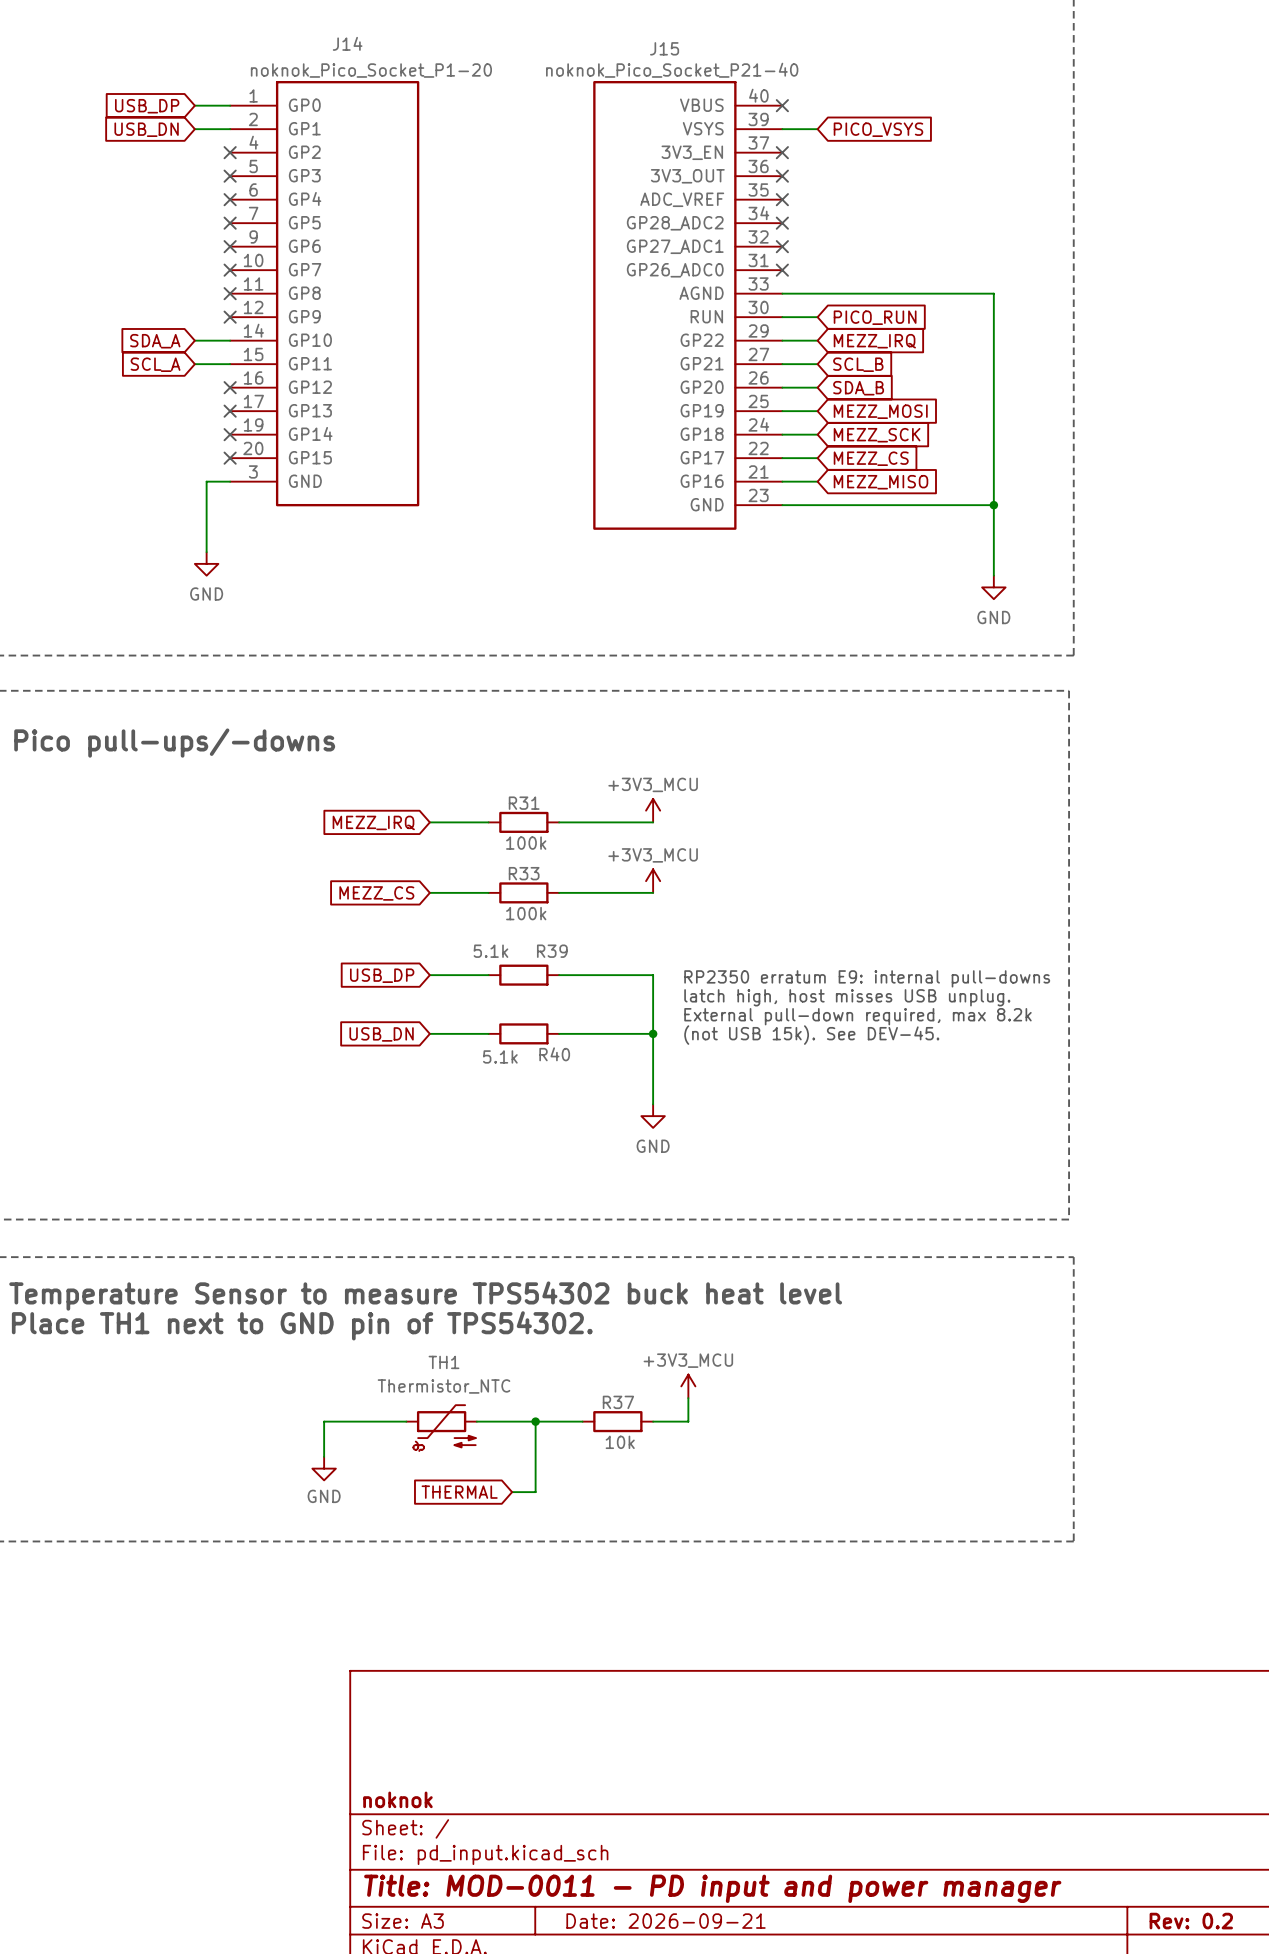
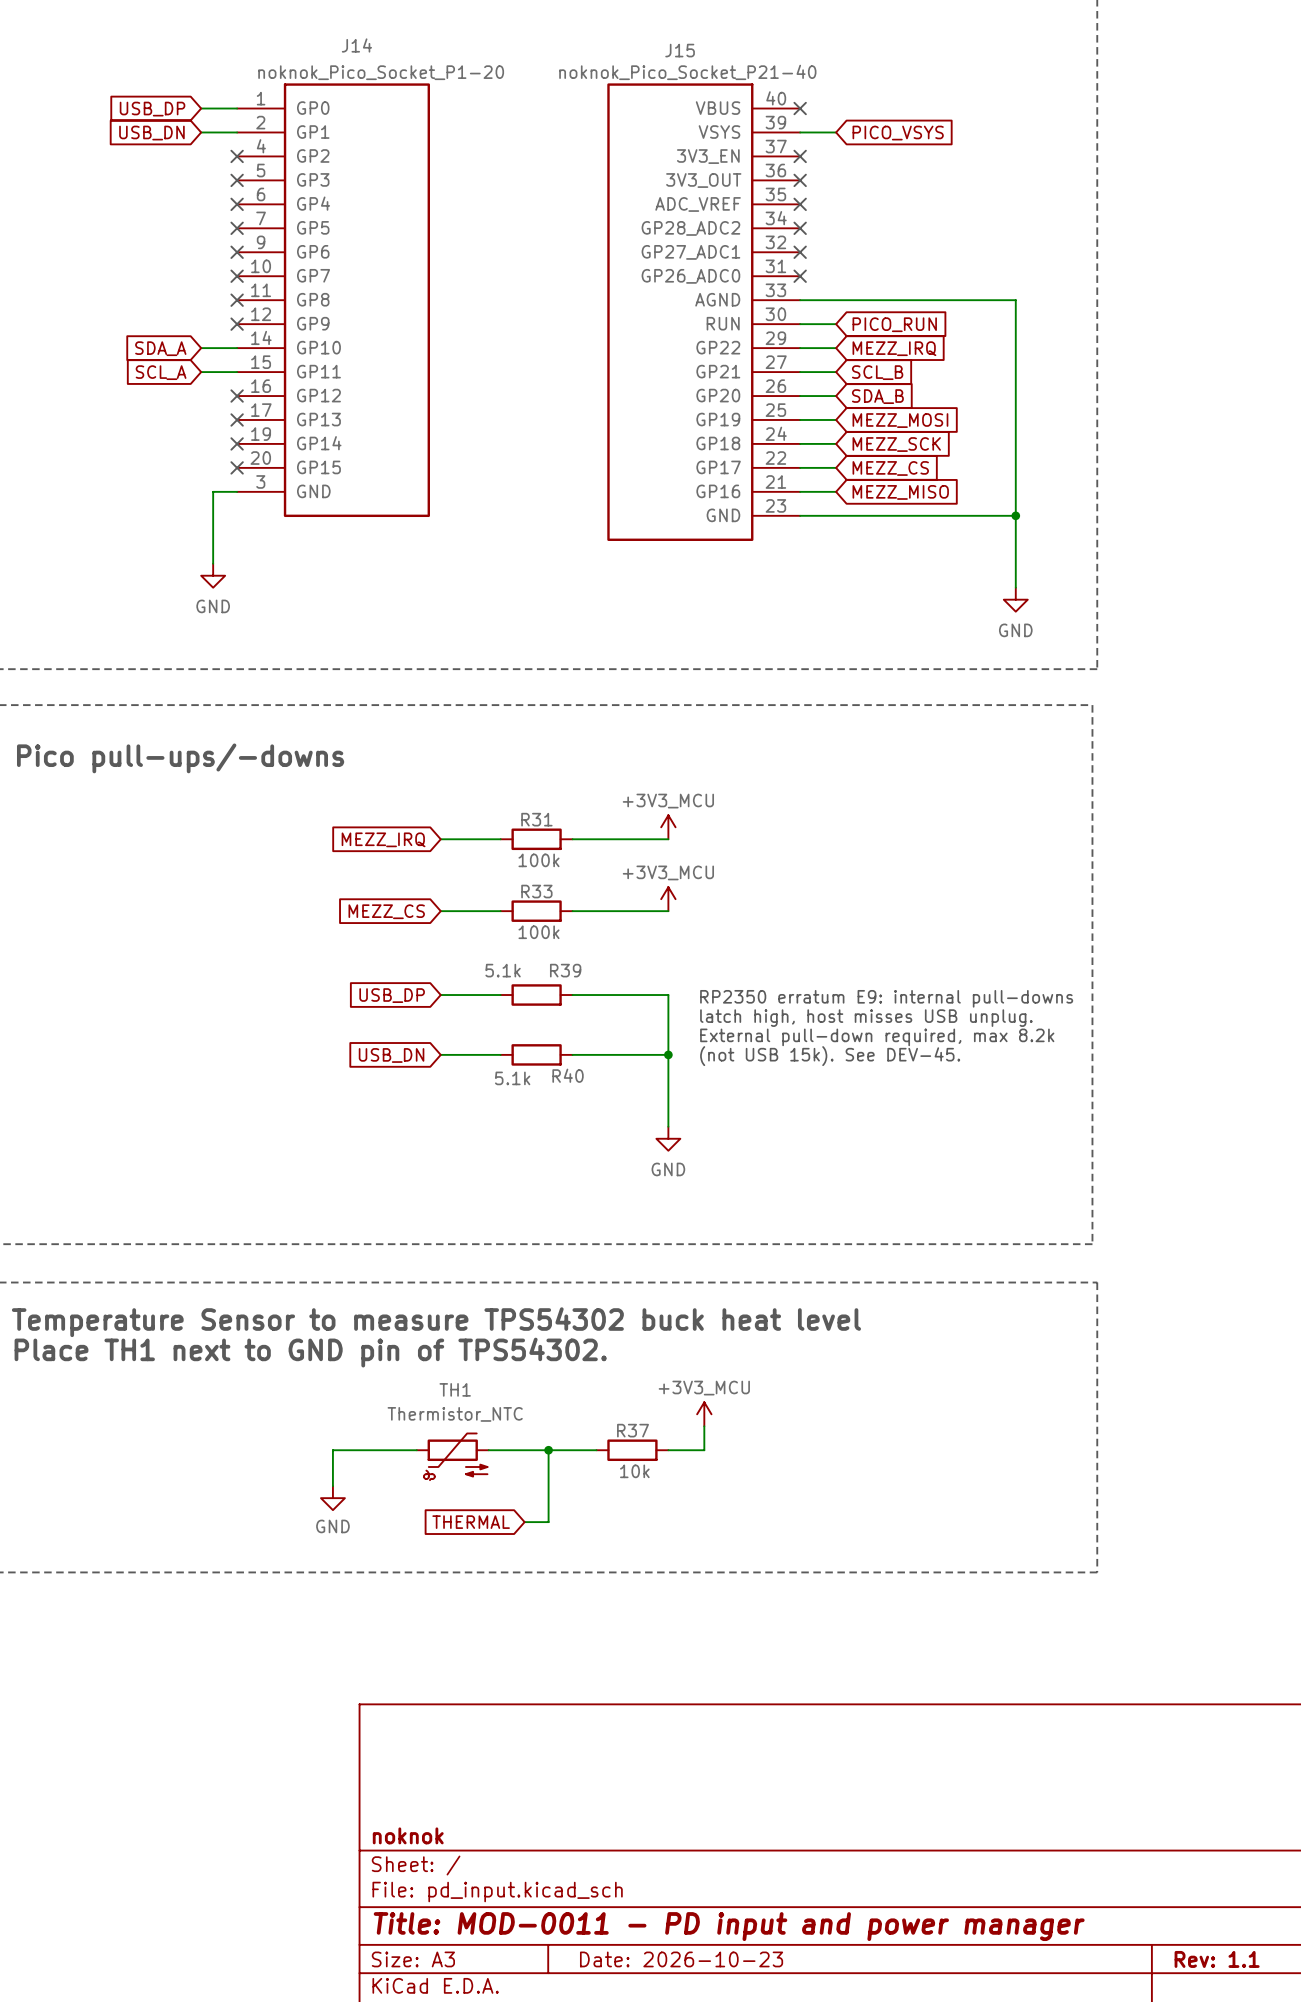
title block: Date: 2026-09-21 (666, 1921) -> Date: 2026-10-23 (681, 1959)
title block: Rev: 0.2 (1191, 1921) -> Rev: 1.1 (1217, 1959)

